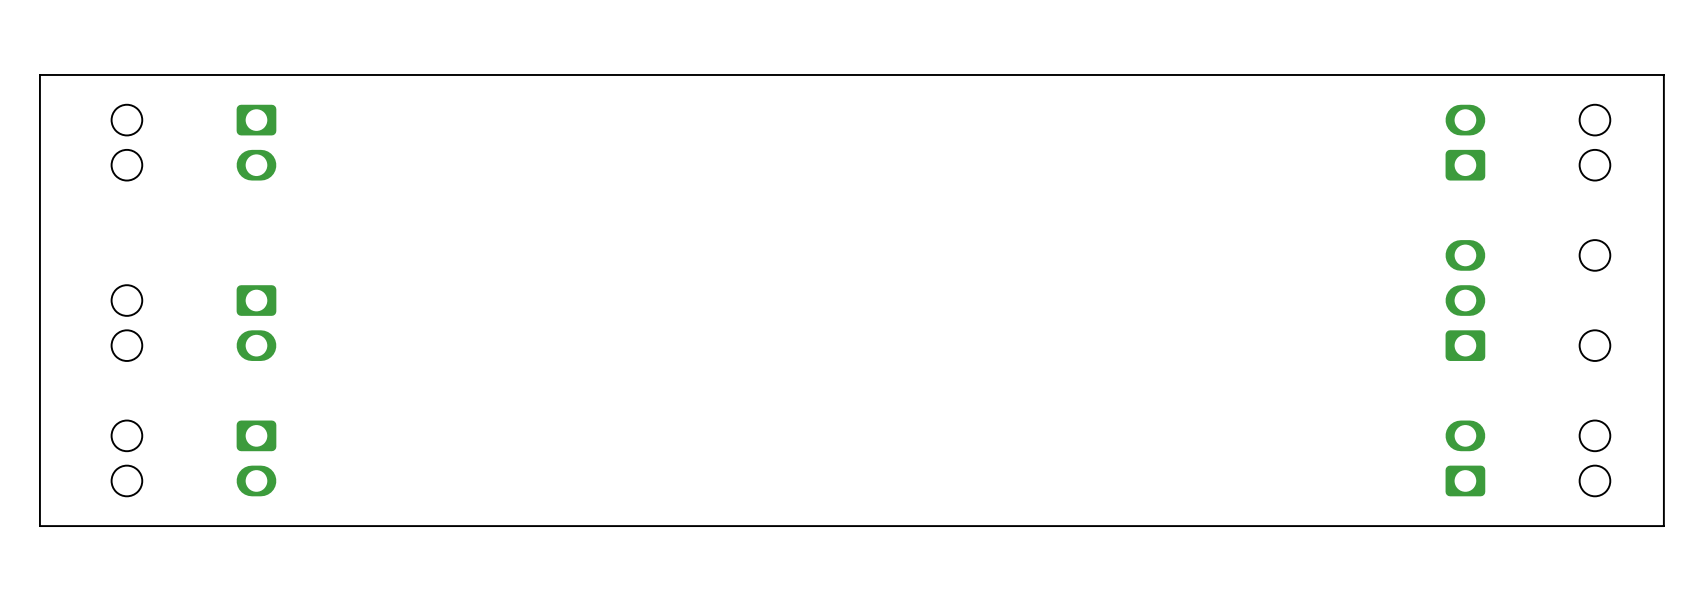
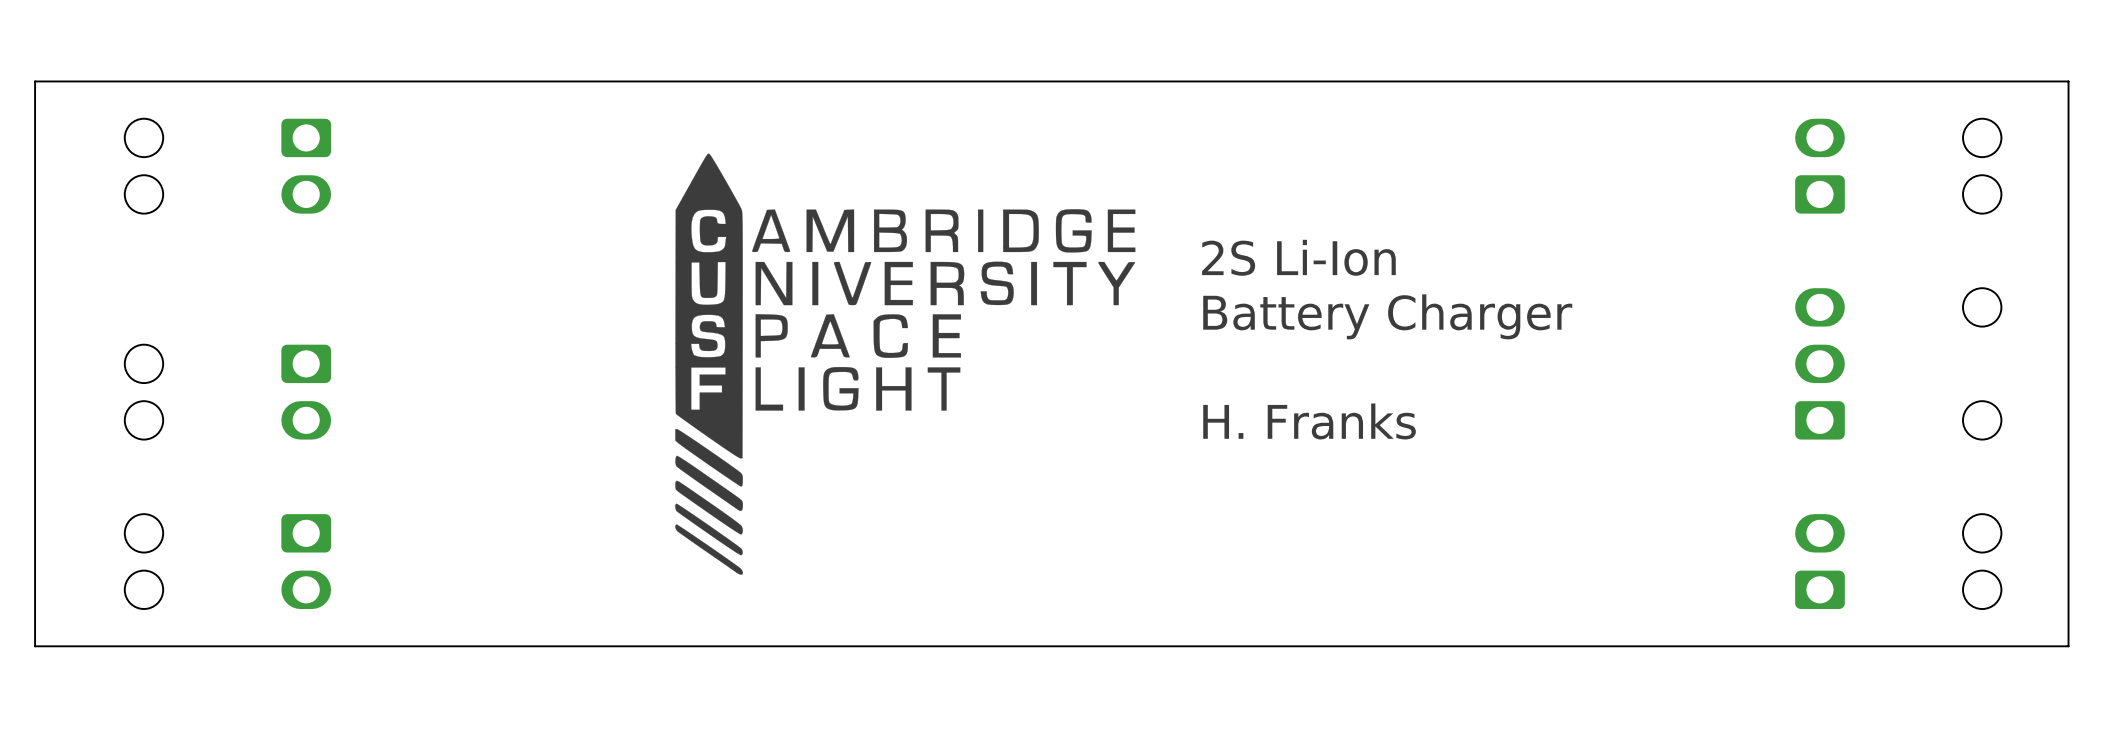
drawing: none -> [675, 153, 1136, 575]
text: none -> 2S Li-Ion (1298, 257)
text: none -> Battery Charger (1387, 316)
text: none -> H. Franks (1309, 421)

